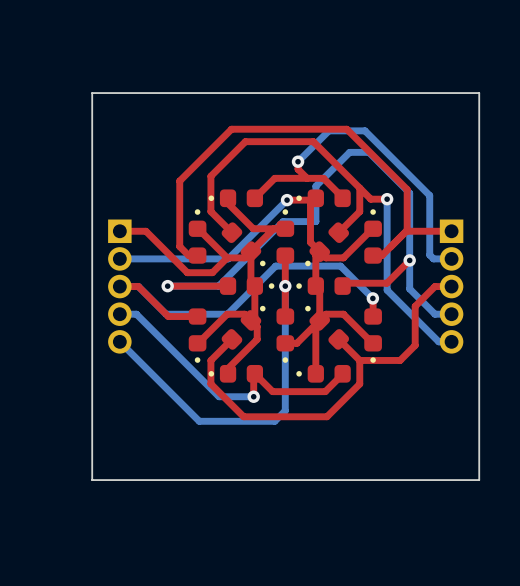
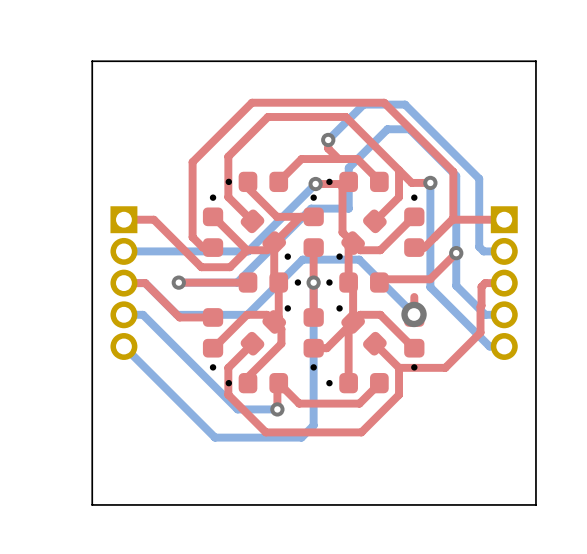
bottom track: (325, 266) (340, 266) (372, 298) -> (359, 259) (414, 314)
top track: (431, 289) (415, 306) (415, 345) -> (481, 286) (480, 332) (462, 350)
via size: [366, 292, 380, 305] -> [401, 301, 427, 328]

